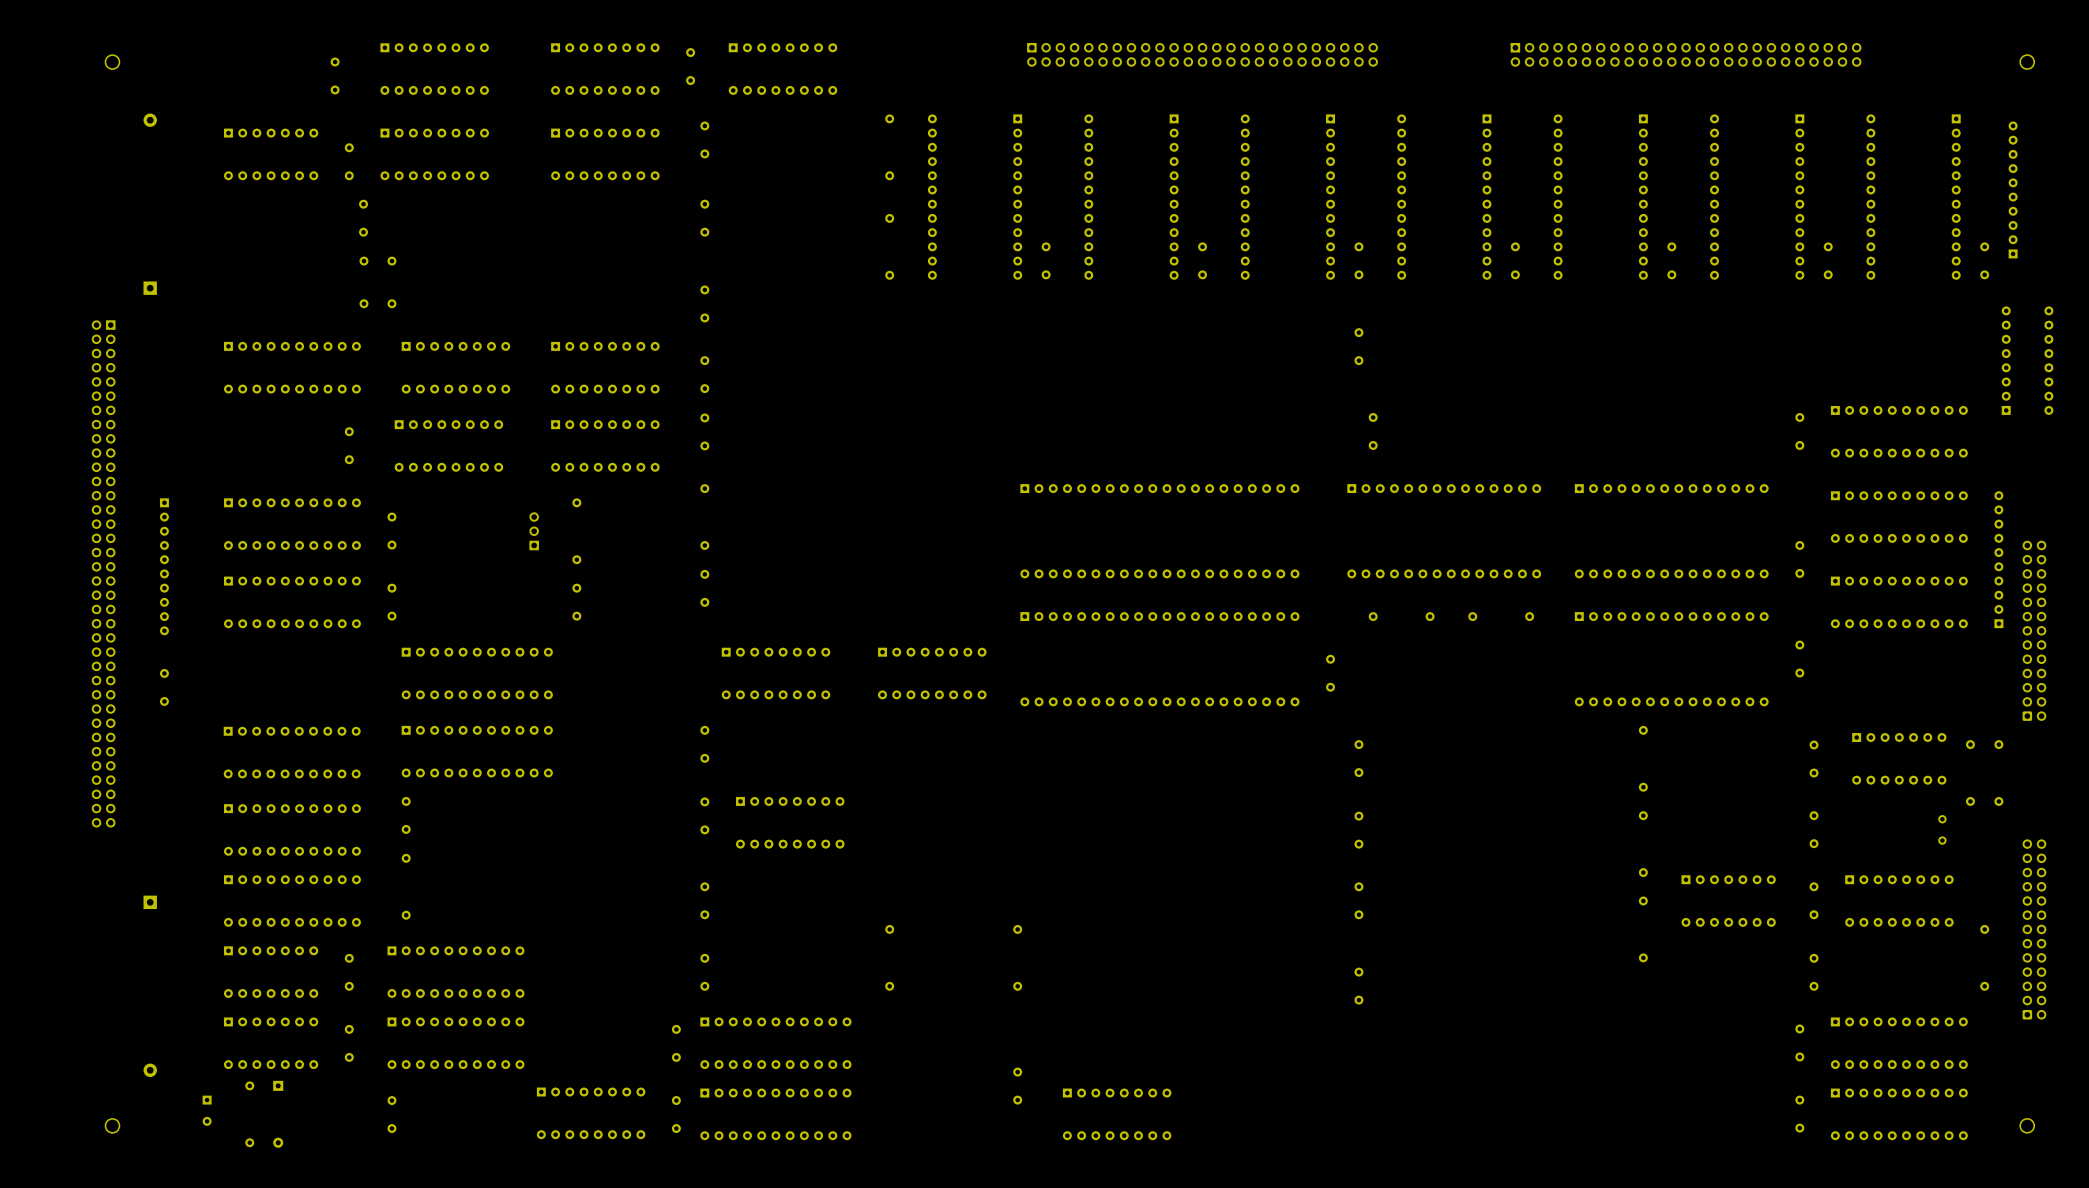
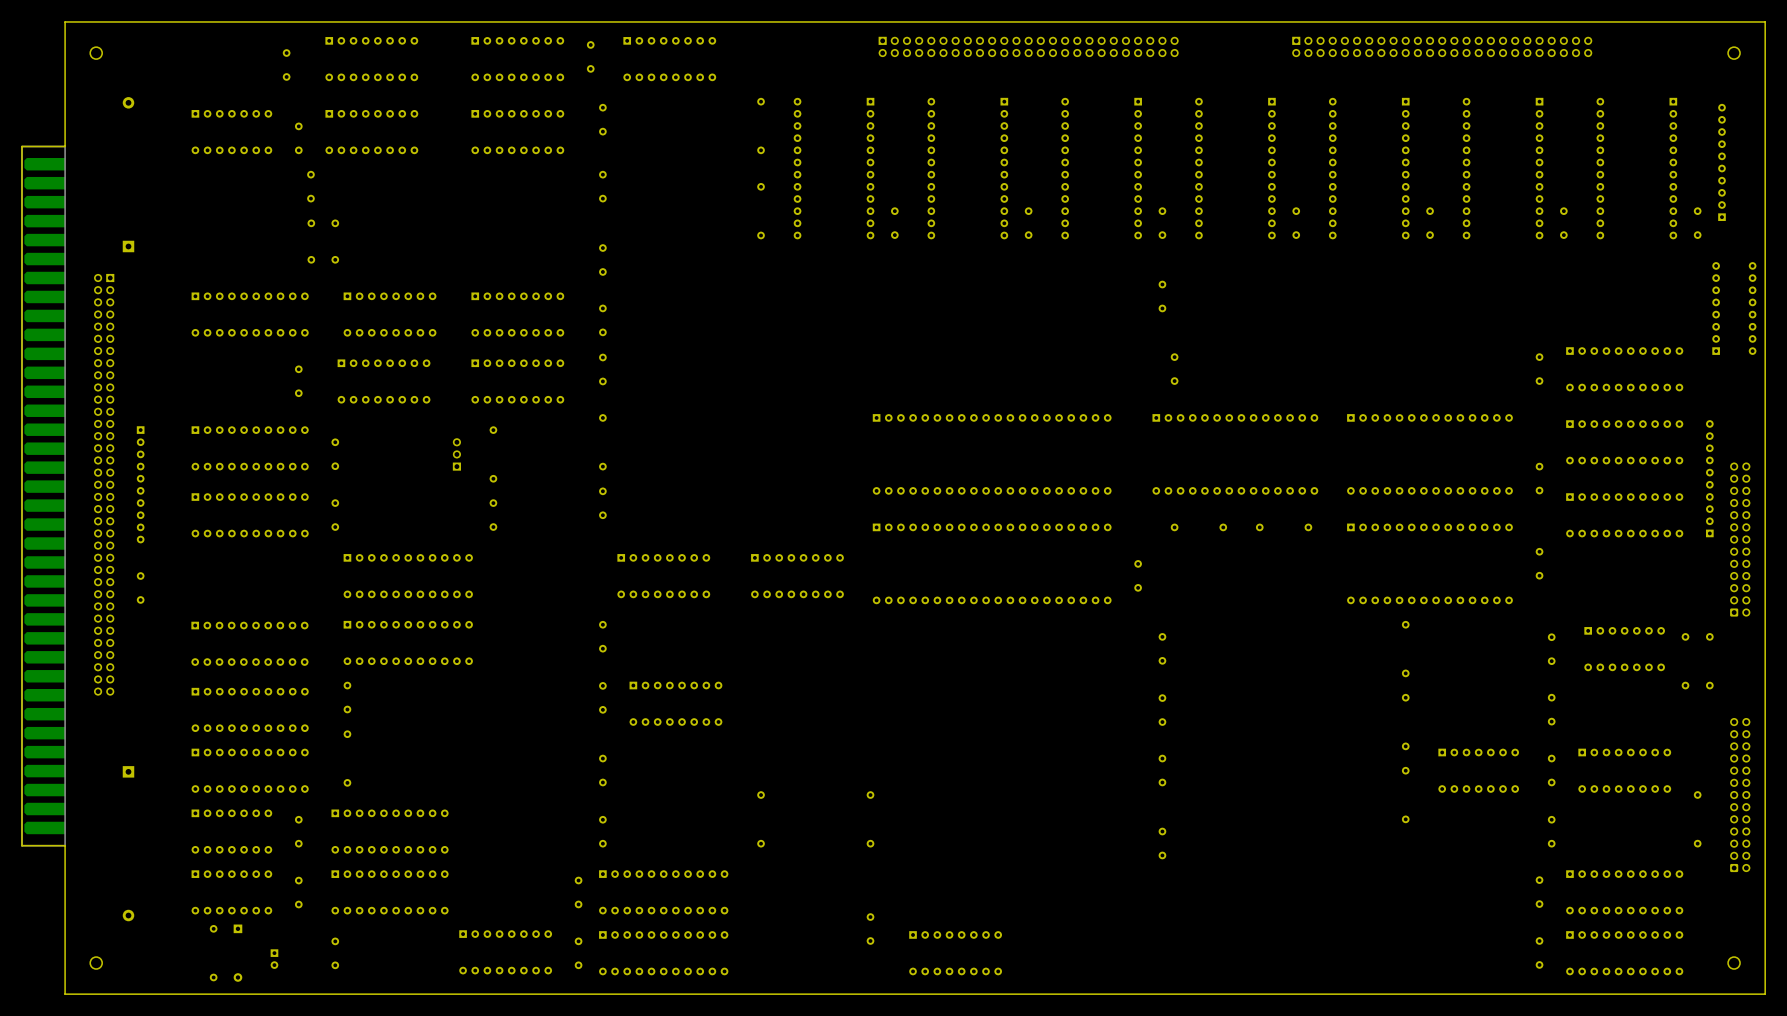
board edge: none -> (1765, 21) (1765, 994) (65, 994) (65, 845) (21, 845) (21, 146) (65, 146) (65, 21) (1765, 21)
part: none -> (104, 484)
part: (103, 573) -> none
part: none -> (43, 496)
part: (1942, 829) -> none
part: (207, 1110) -> none
part: none -> (274, 959)

